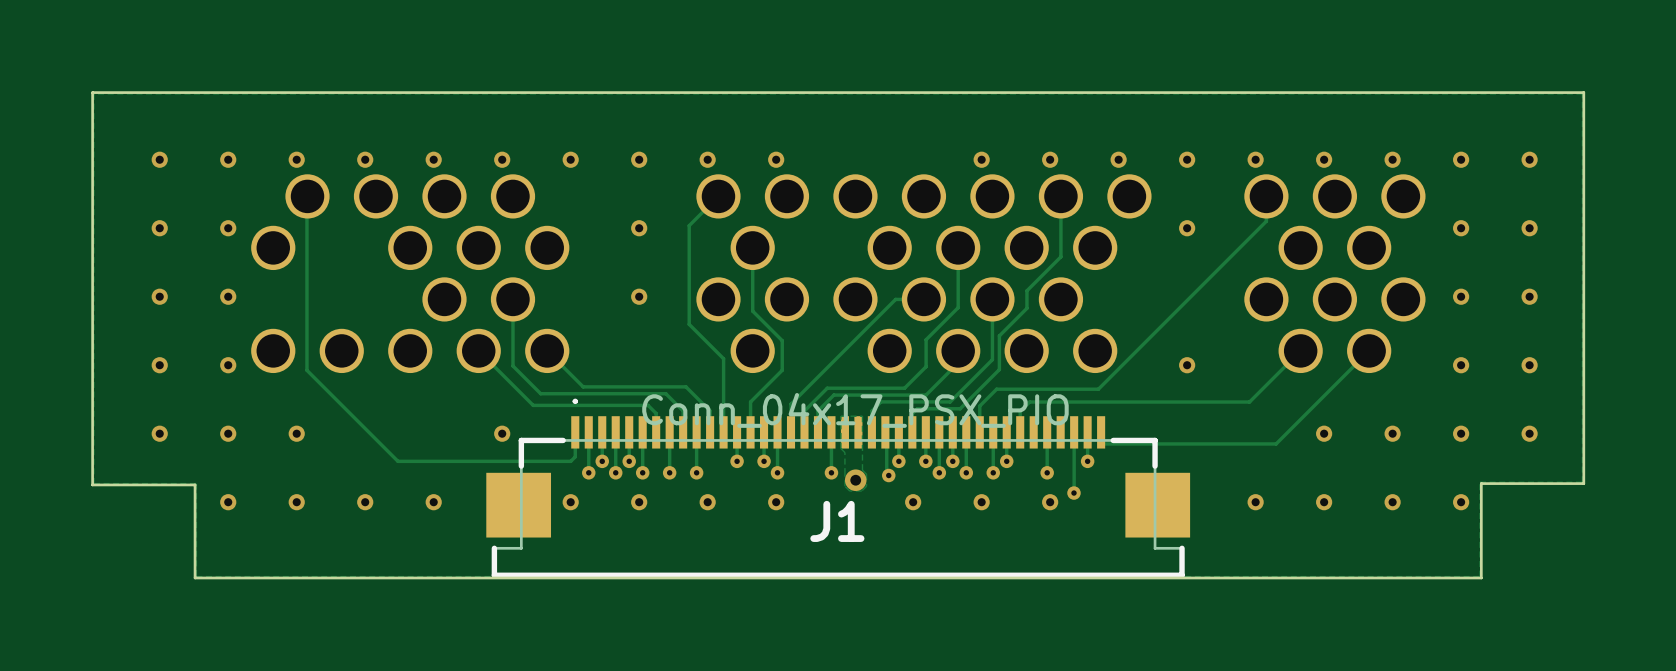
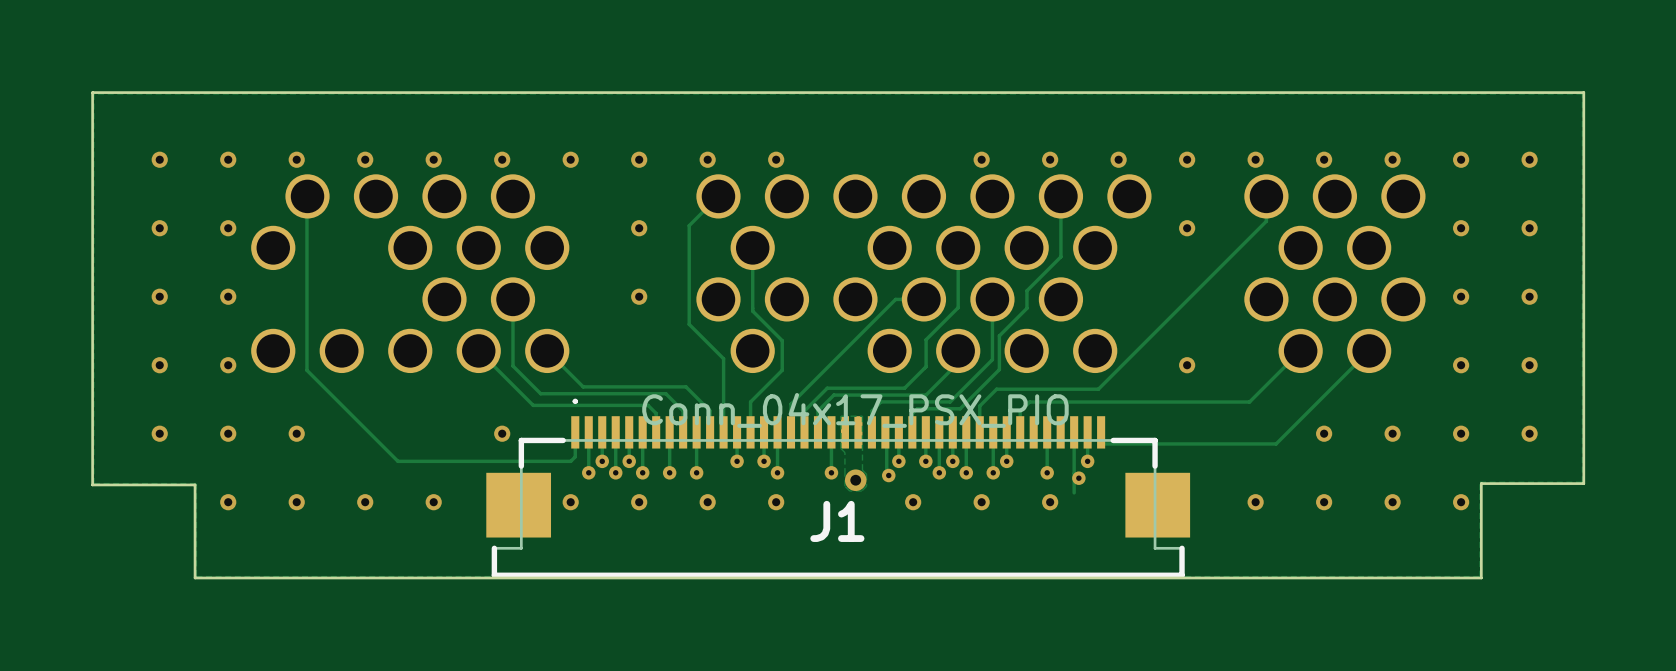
via position: (1073, 493) -> (1078, 478)

